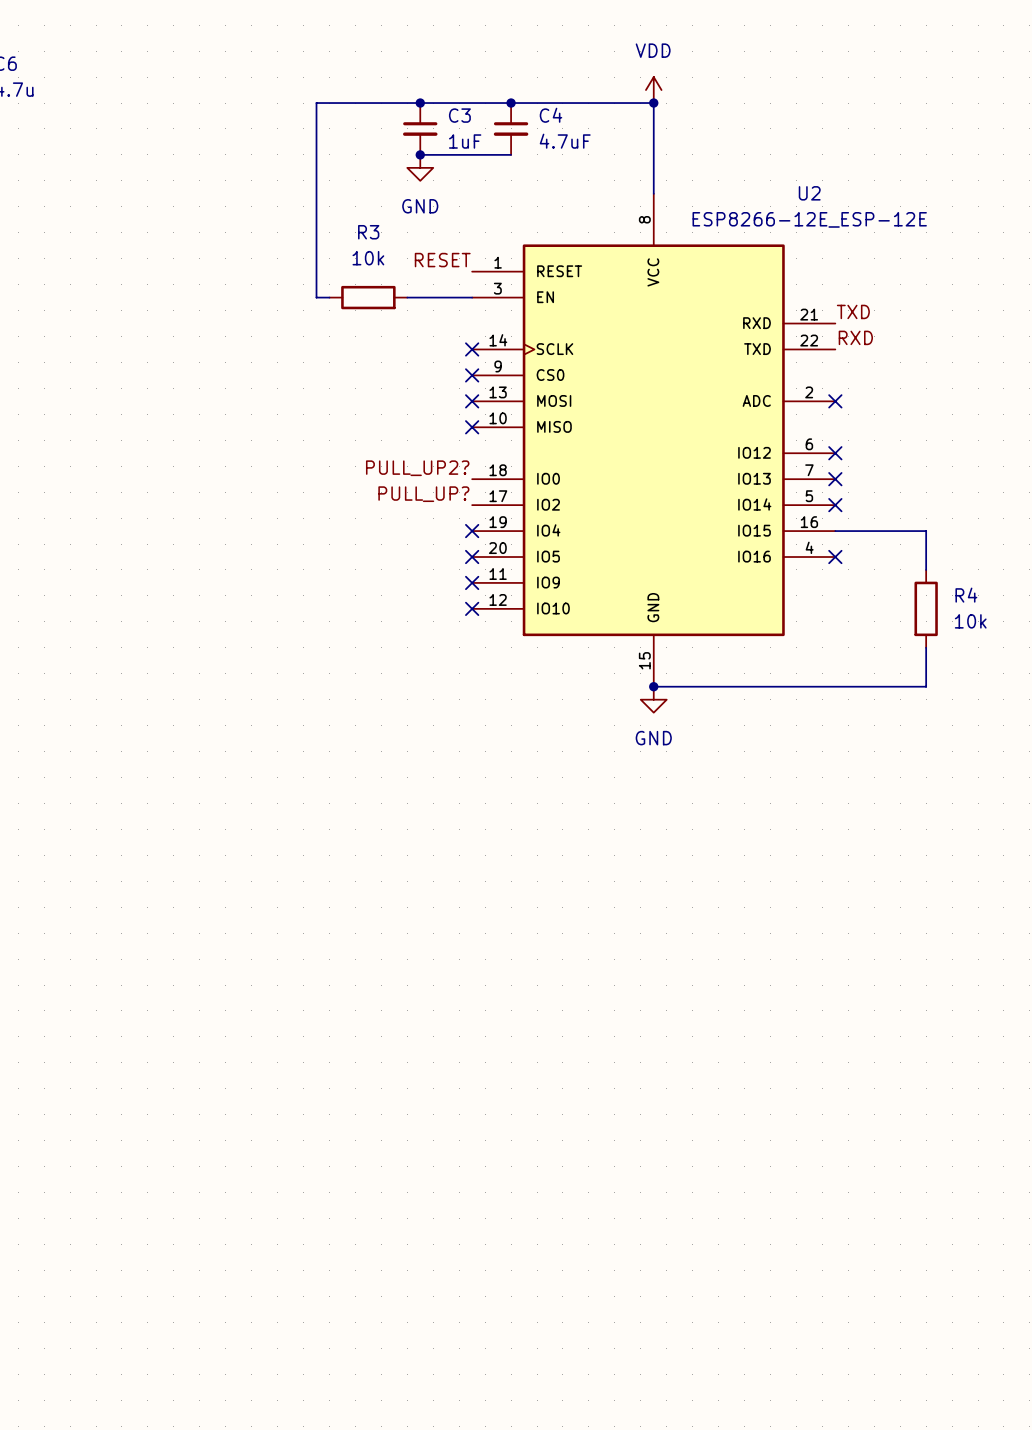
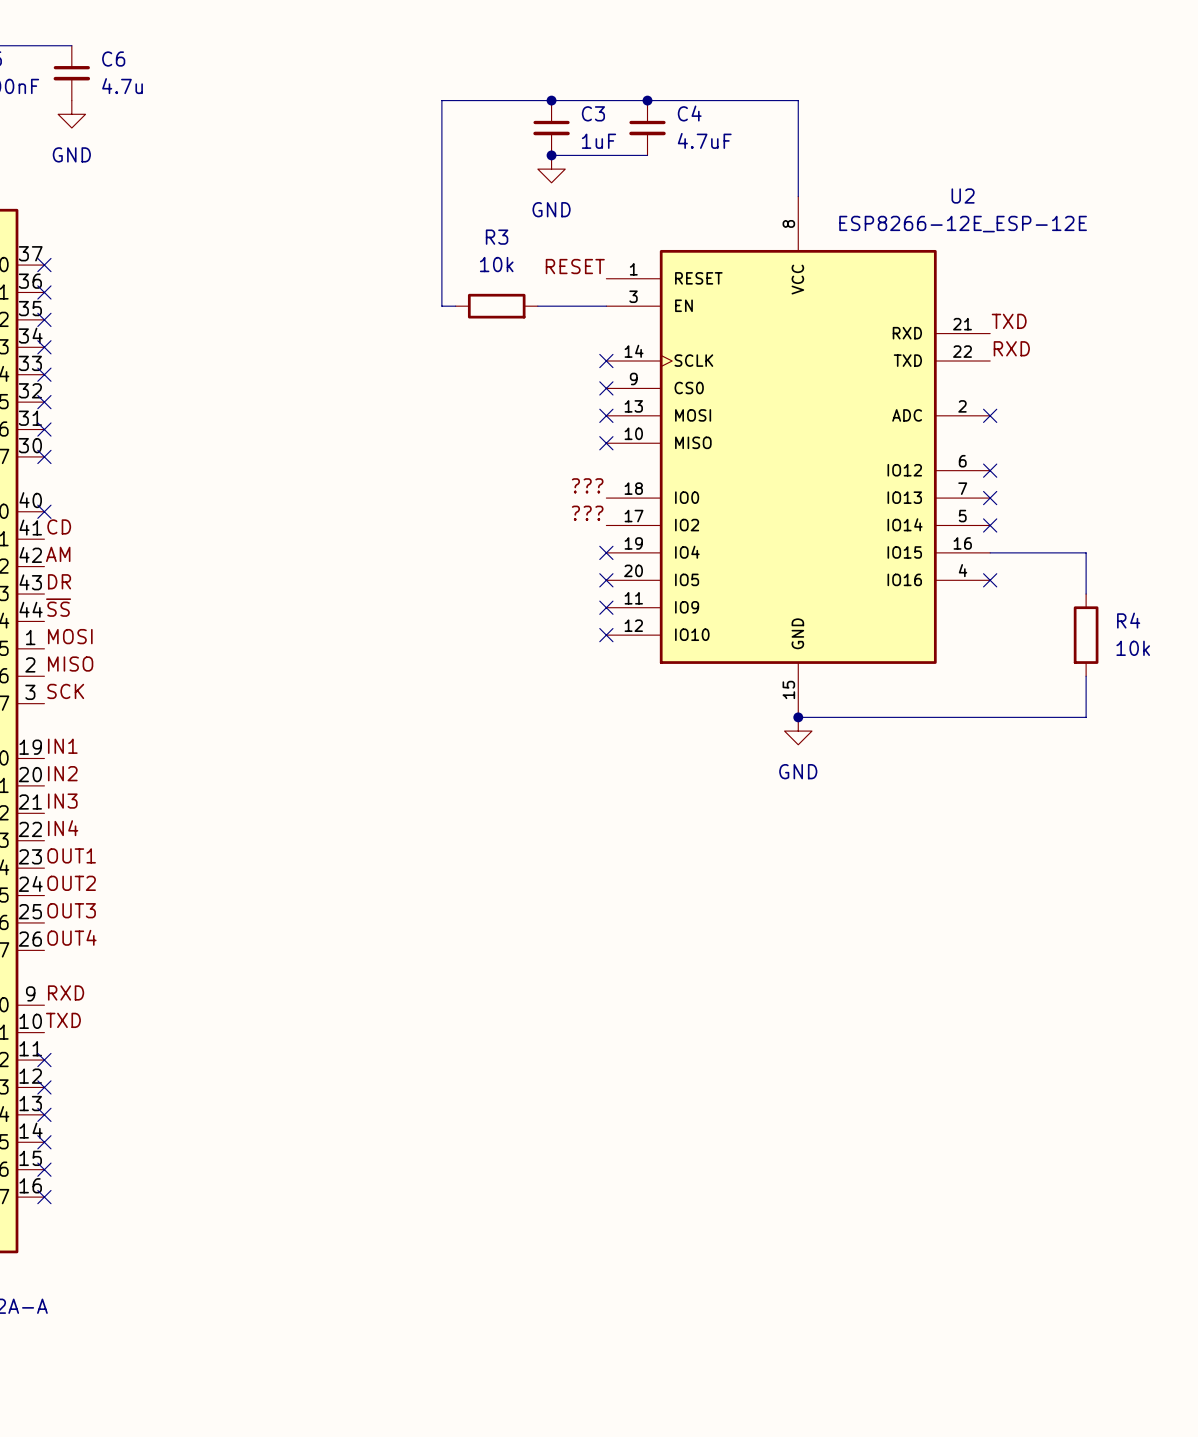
power symbol: VDD (653, 90) -> none
junction: (653, 103) -> none
label: PULL_UP2? (417, 468) -> ??? (587, 485)
label: PULL_UP? (423, 494) -> ??? (587, 513)

